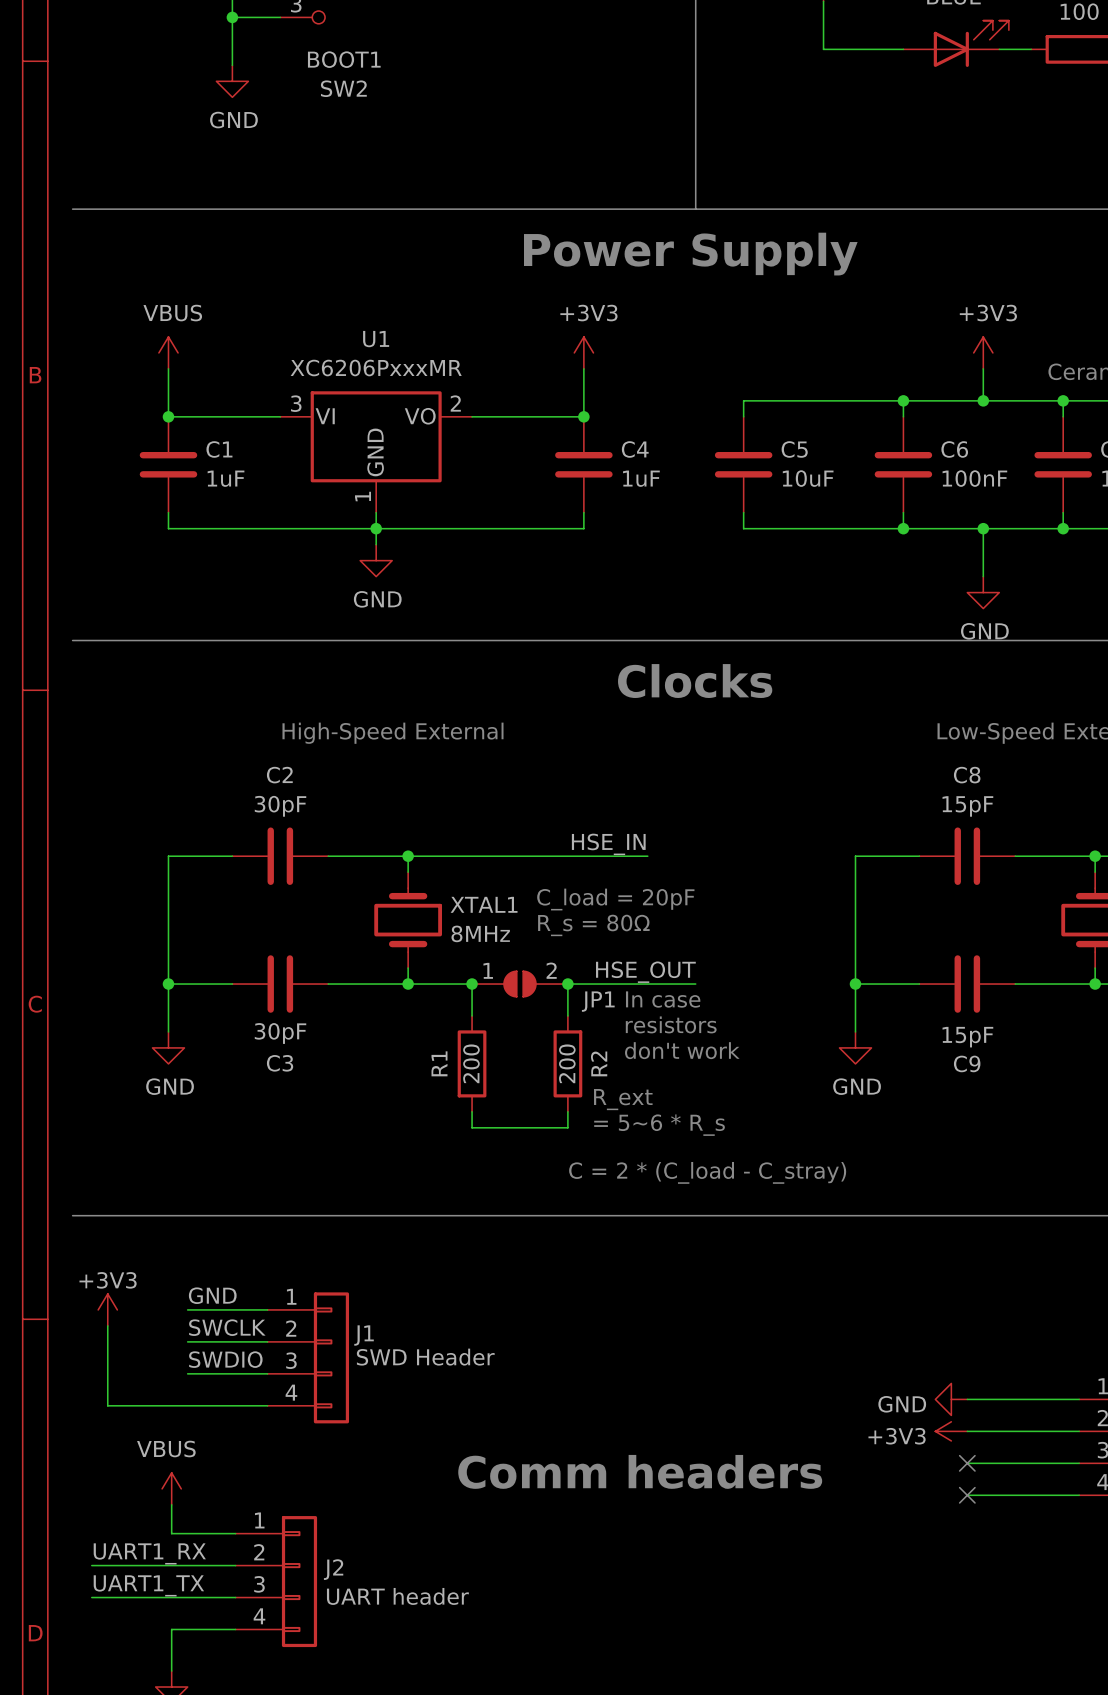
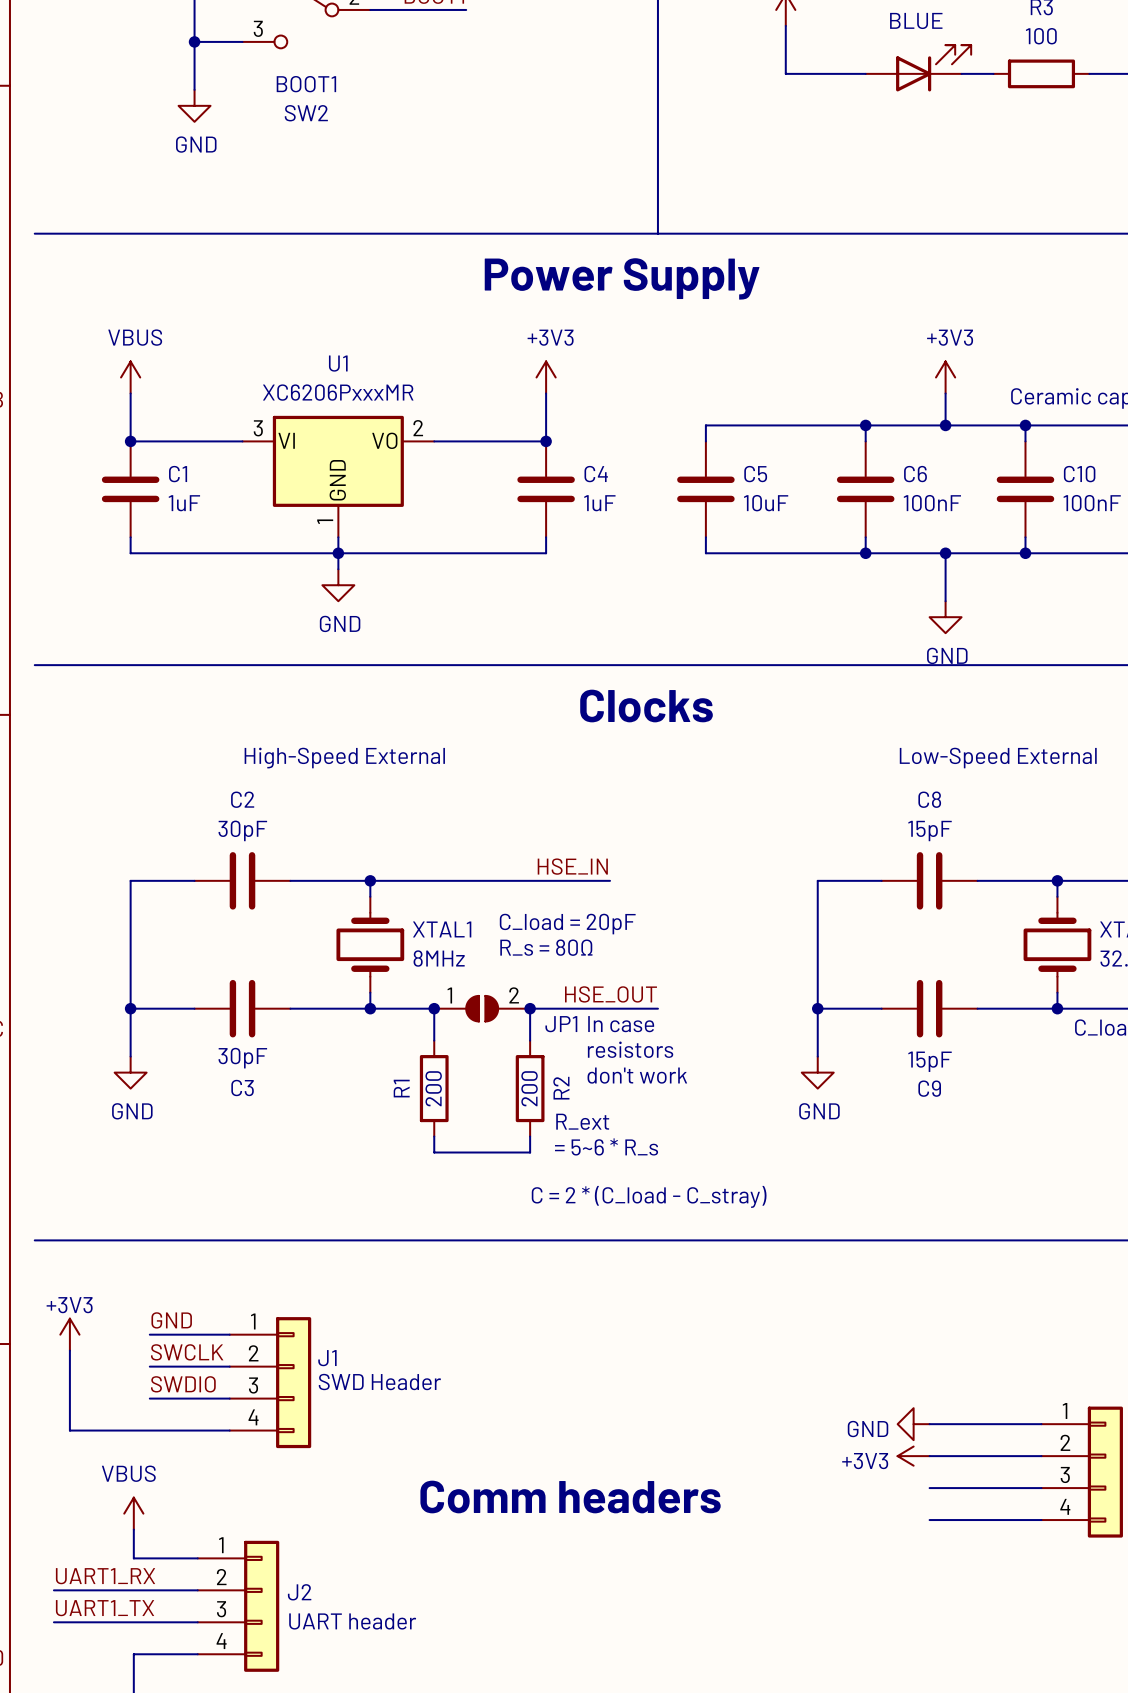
no-connect mark: (967, 1463) -> none
no-connect mark: (967, 1495) -> none

